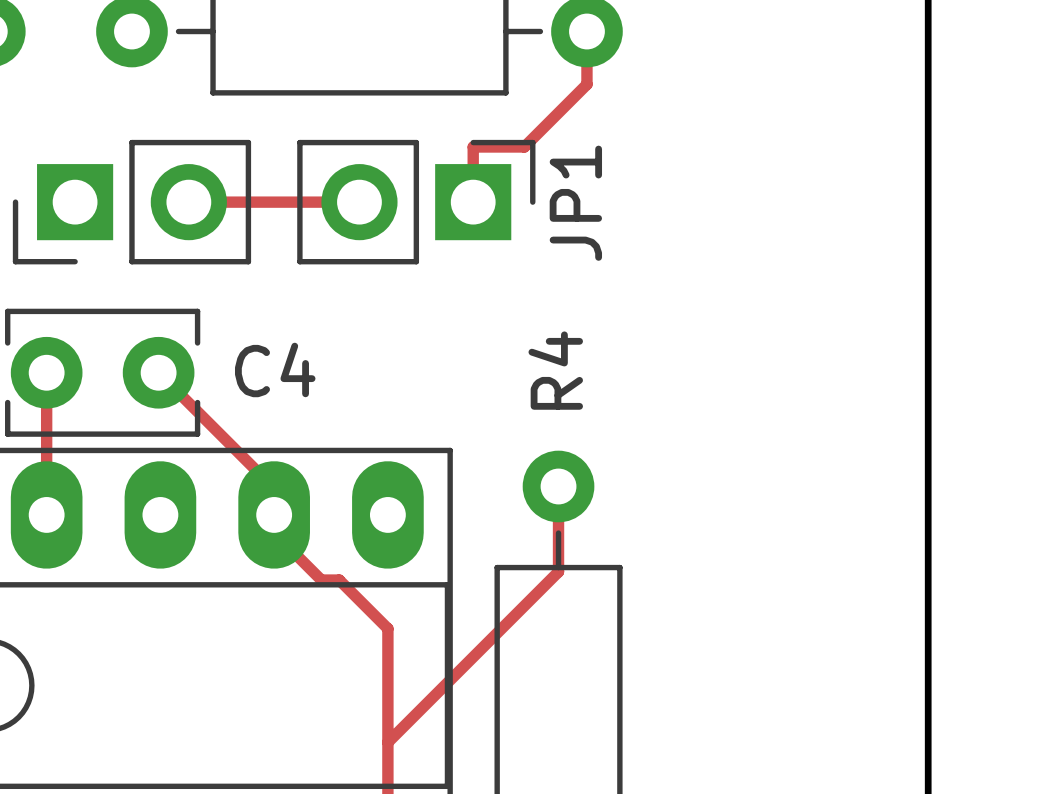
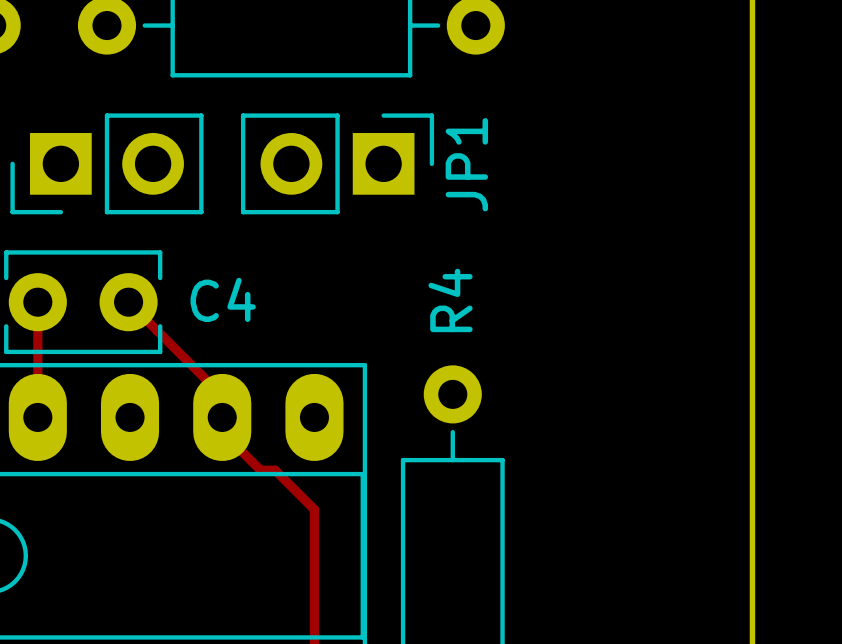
track: (586, 31) (586, 84) (524, 146) (473, 146) (473, 202) -> none
track: (188, 202) (359, 202) -> none
track: (558, 486) (558, 571) (387, 742) -> none

